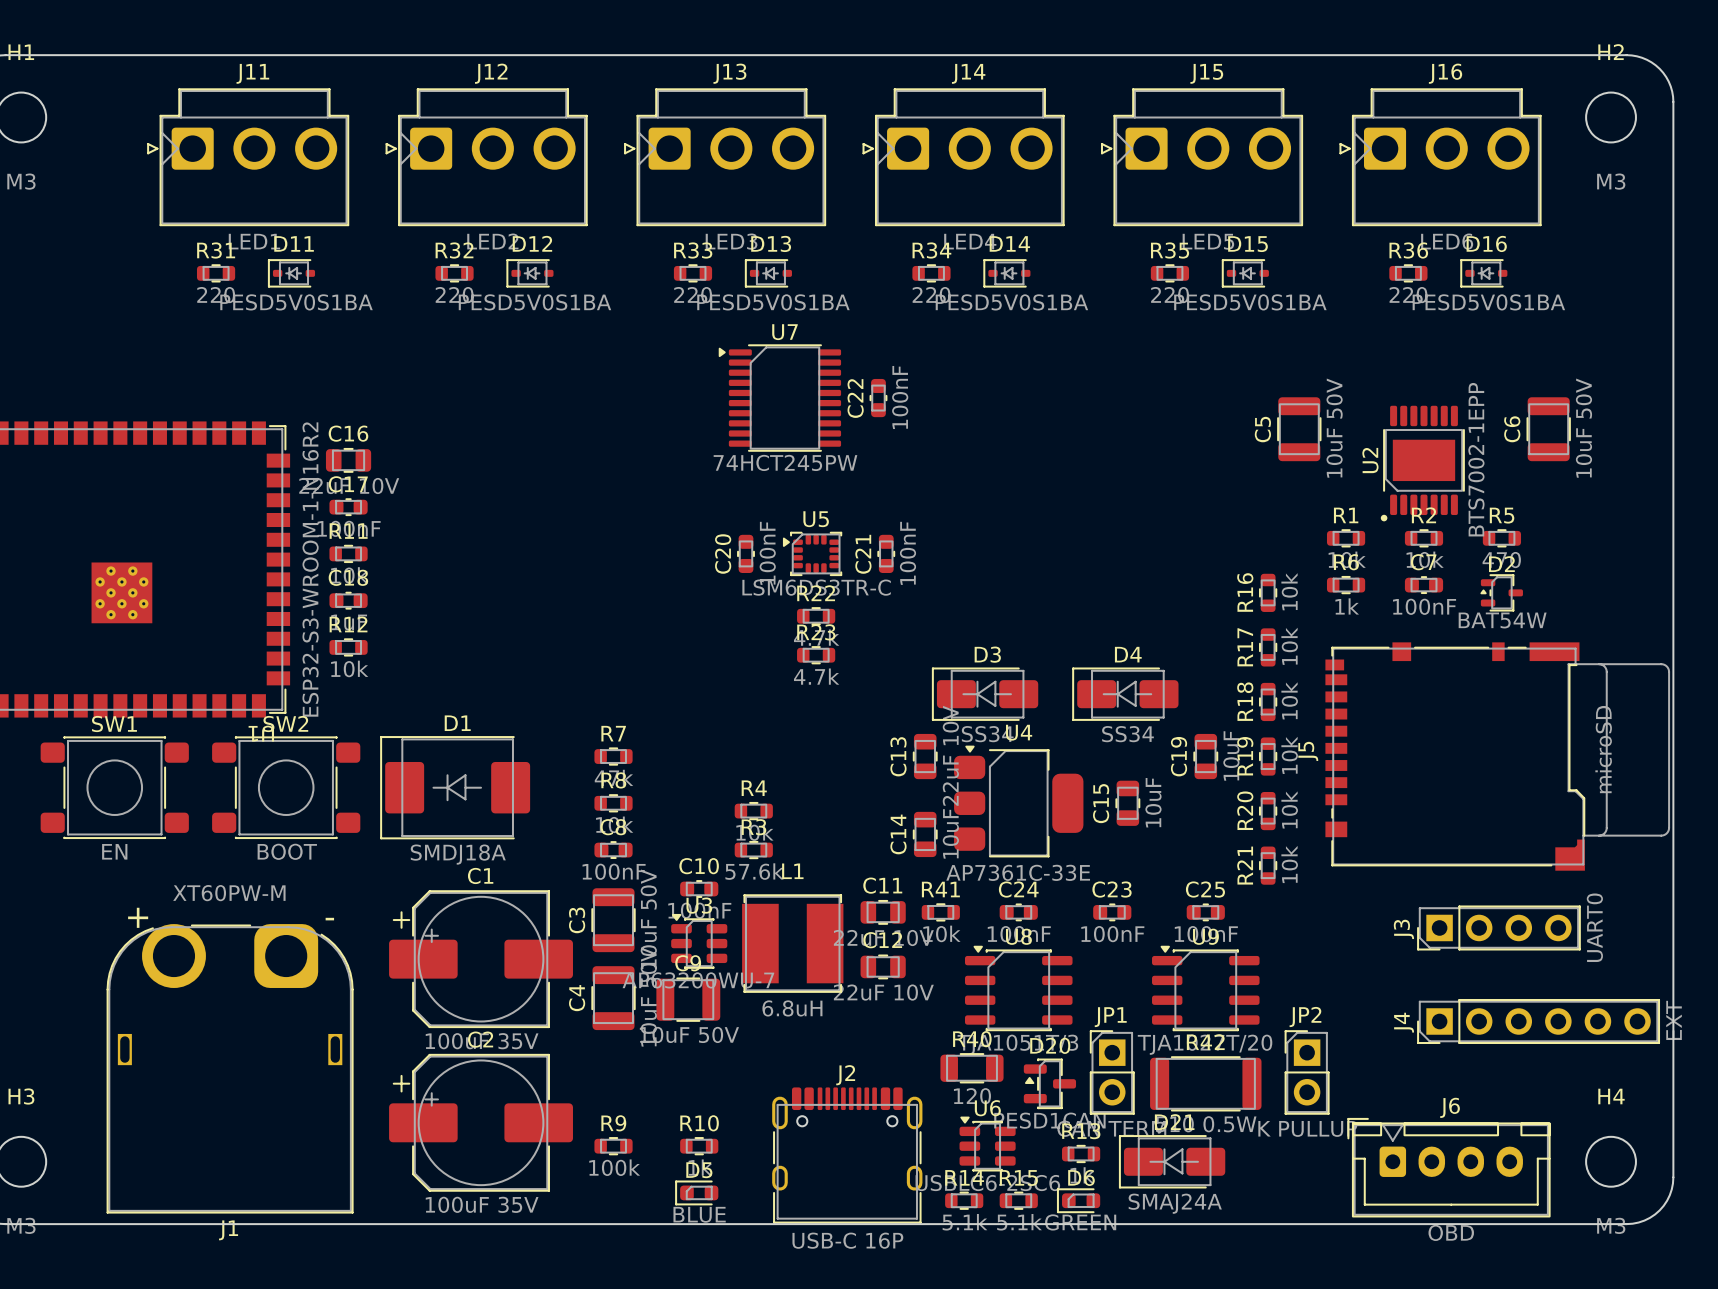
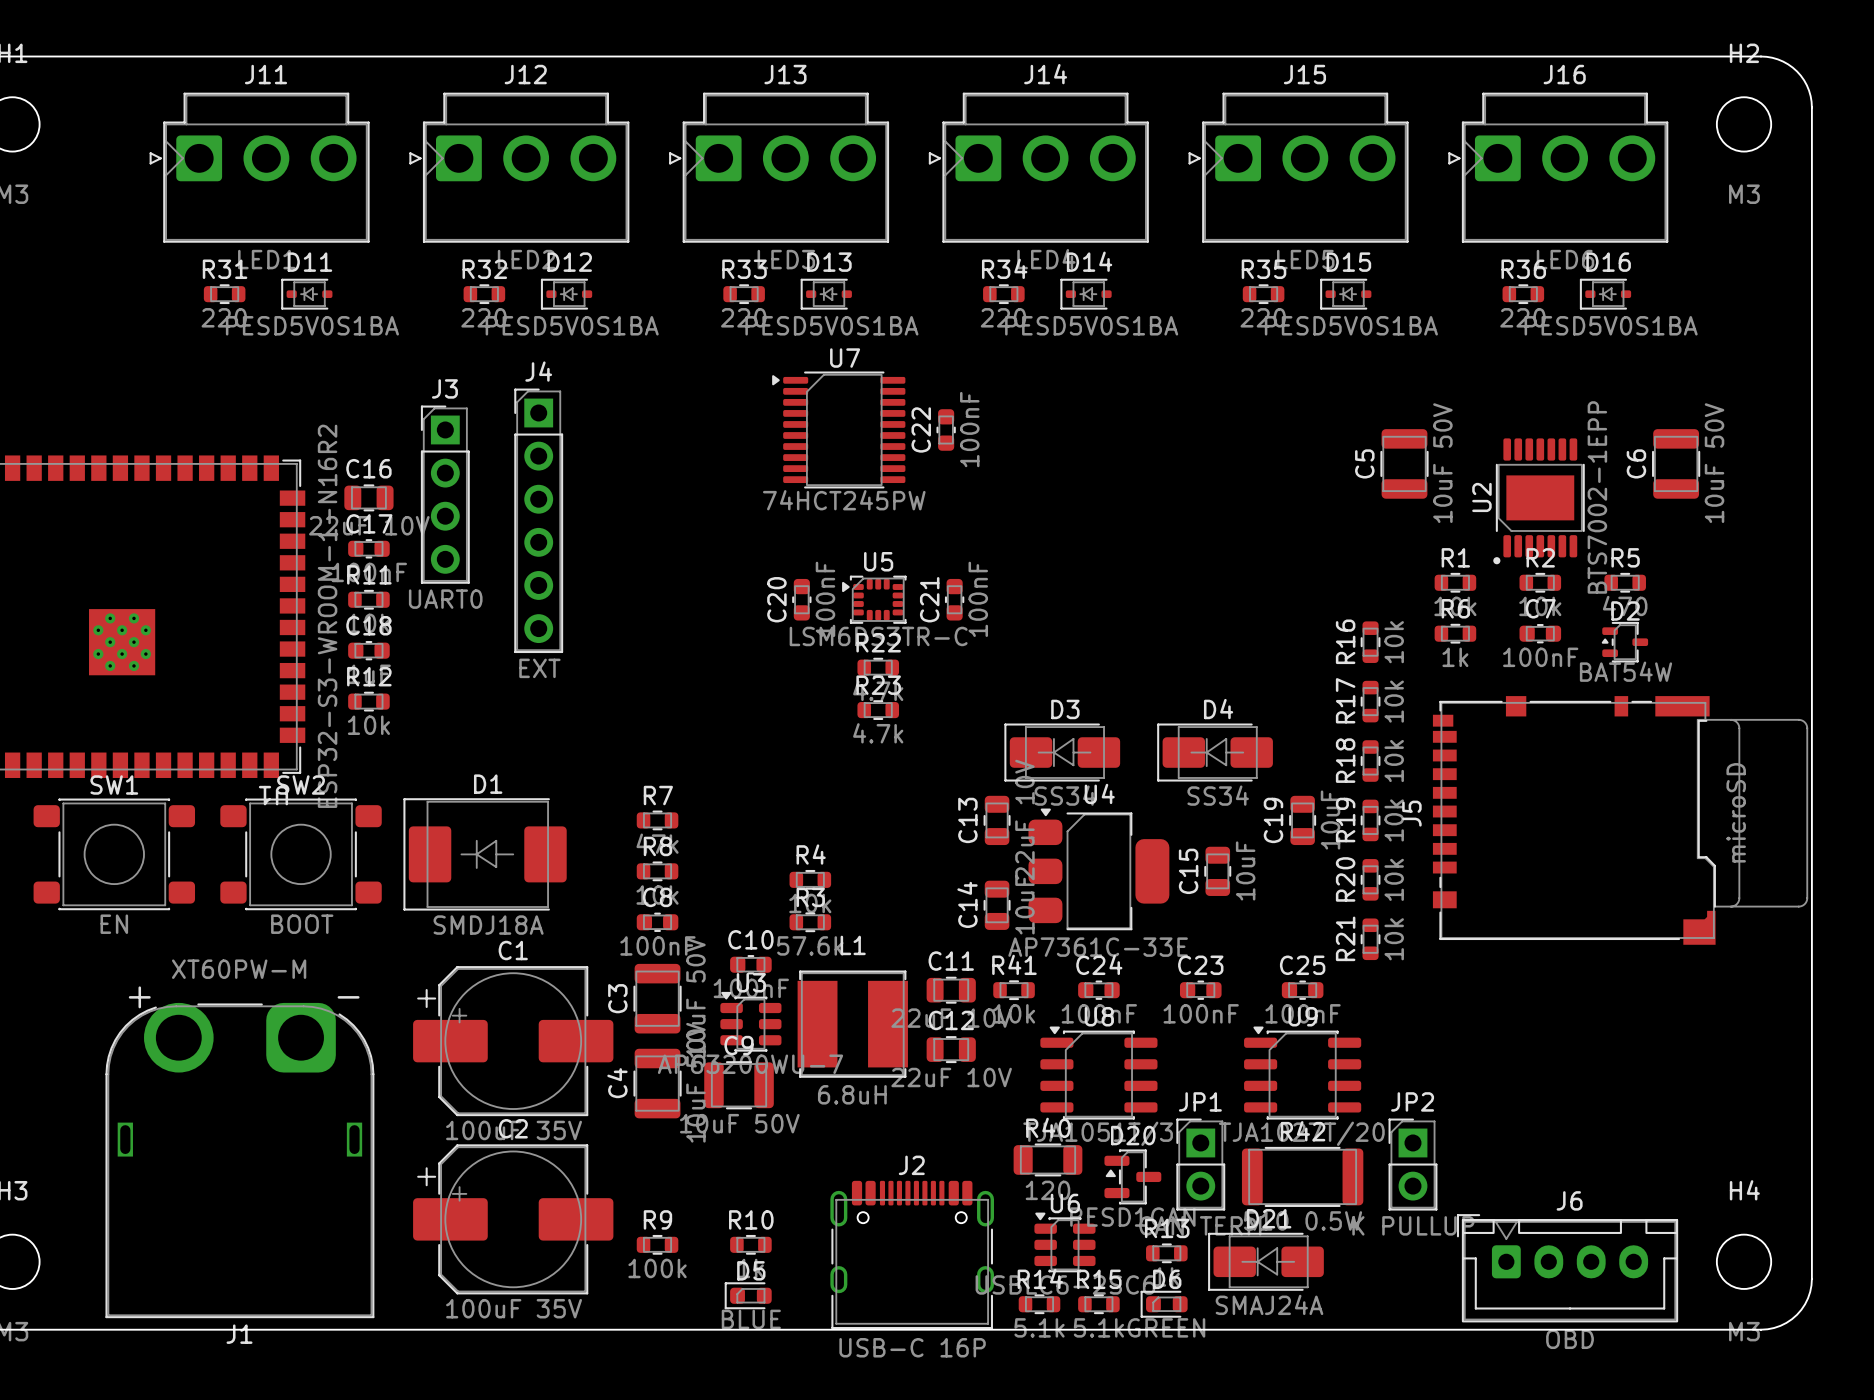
J3 rotation: 0° (1498, 927) -> 90° clockwise (445, 494)
J3 position: (1498, 927) -> (445, 494)
J4 rotation: 0° (1538, 1021) -> 90° clockwise (538, 520)
J4 position: (1538, 1021) -> (538, 520)

